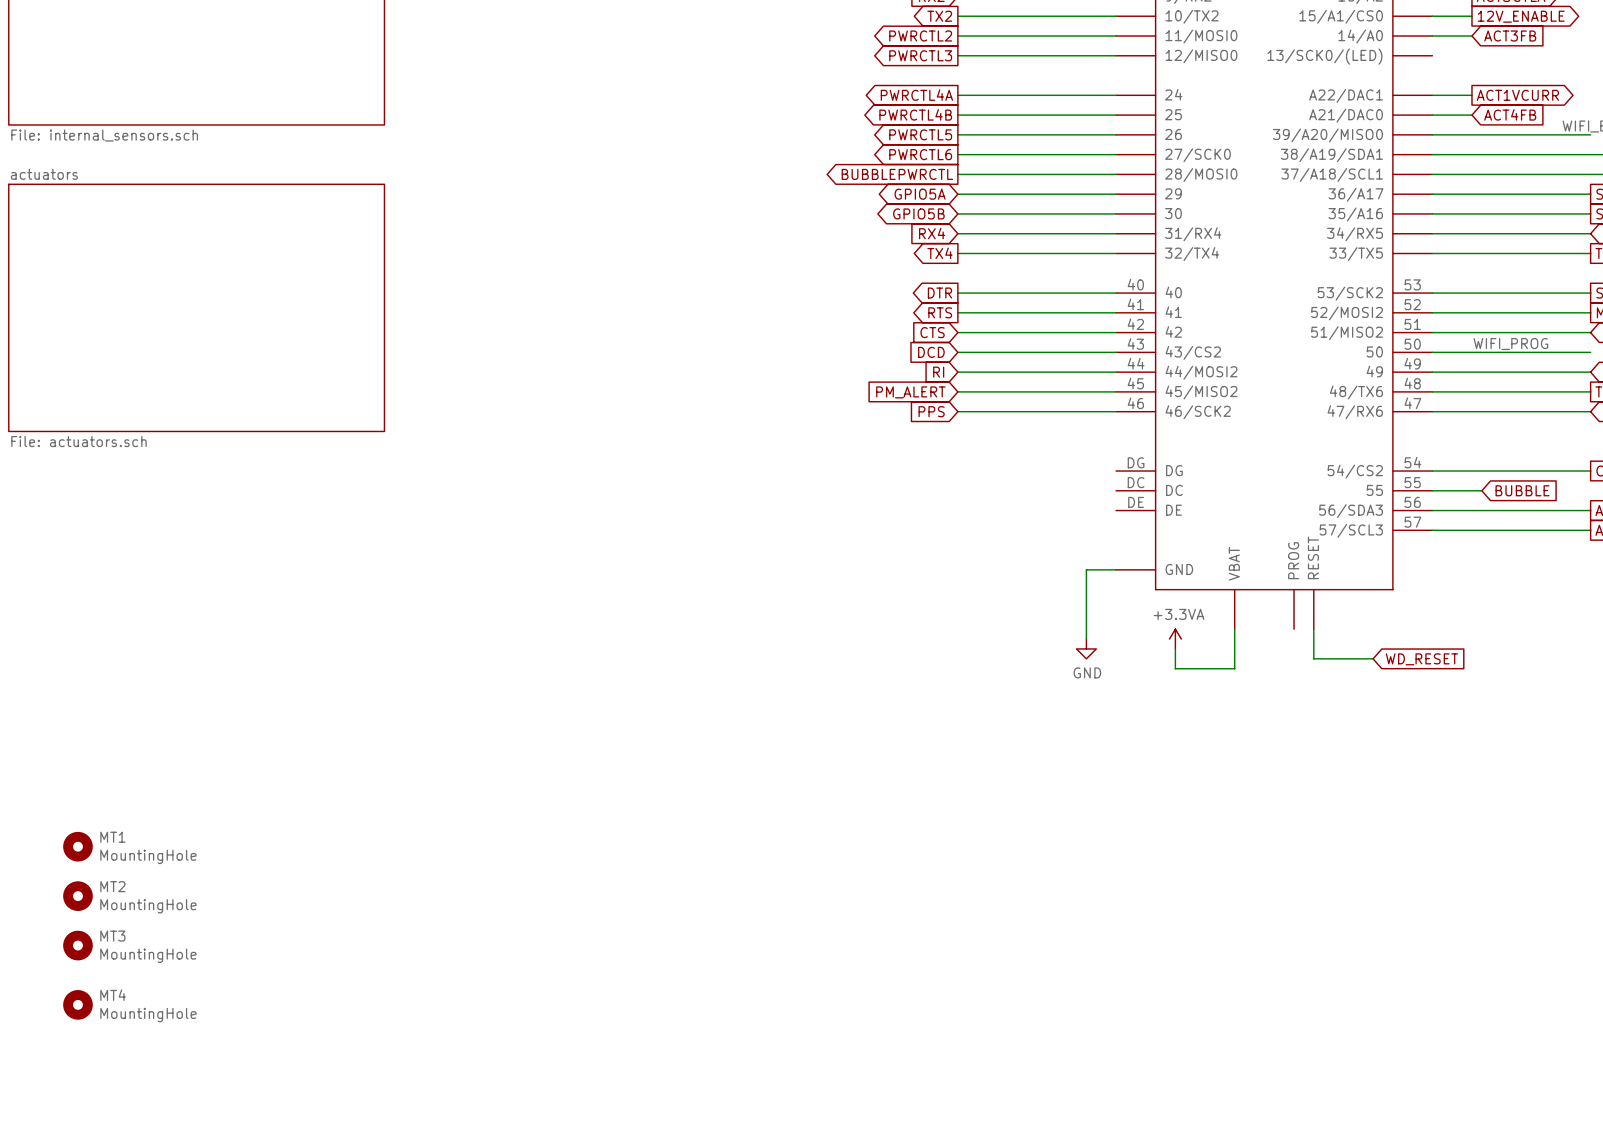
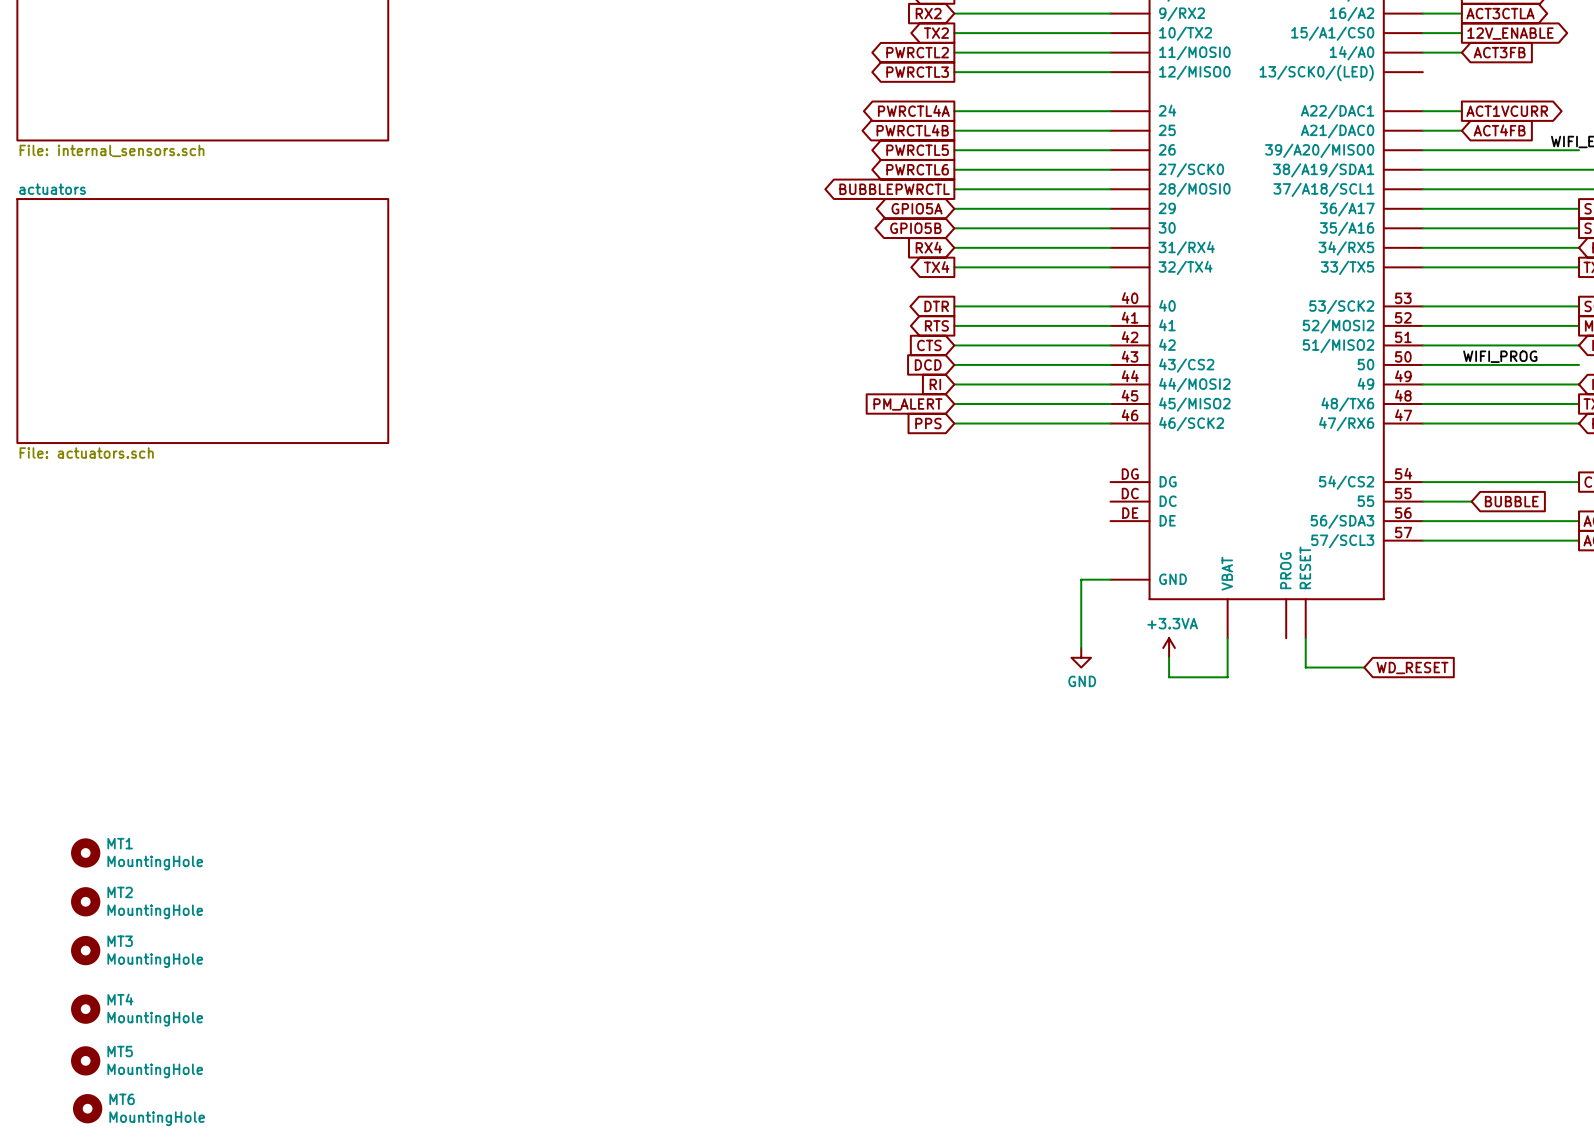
MT5: none -> MountingHole (85, 1060)
MT6: none -> MountingHole (87, 1108)

